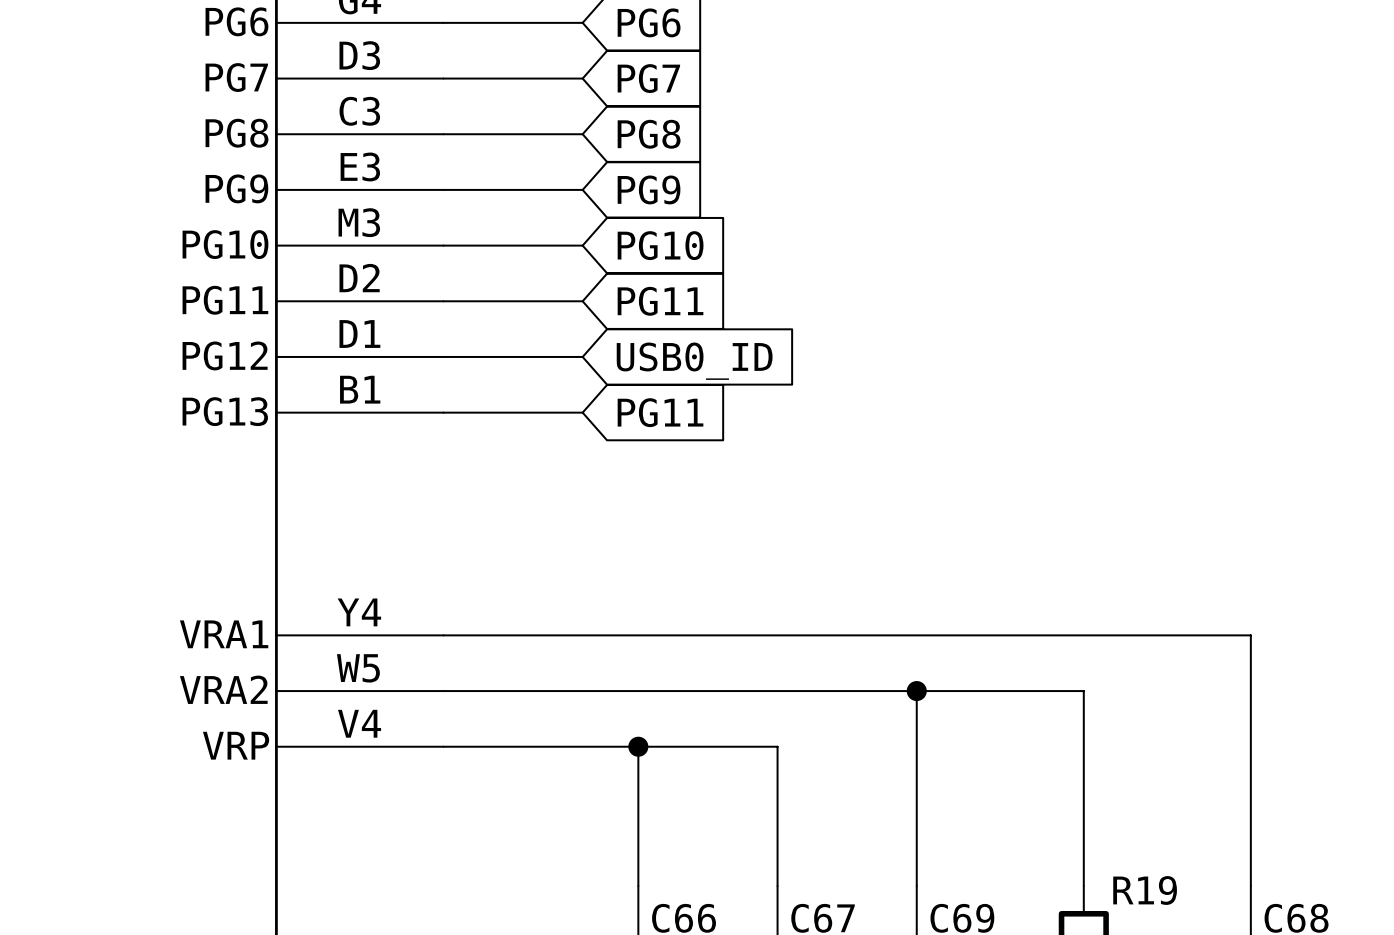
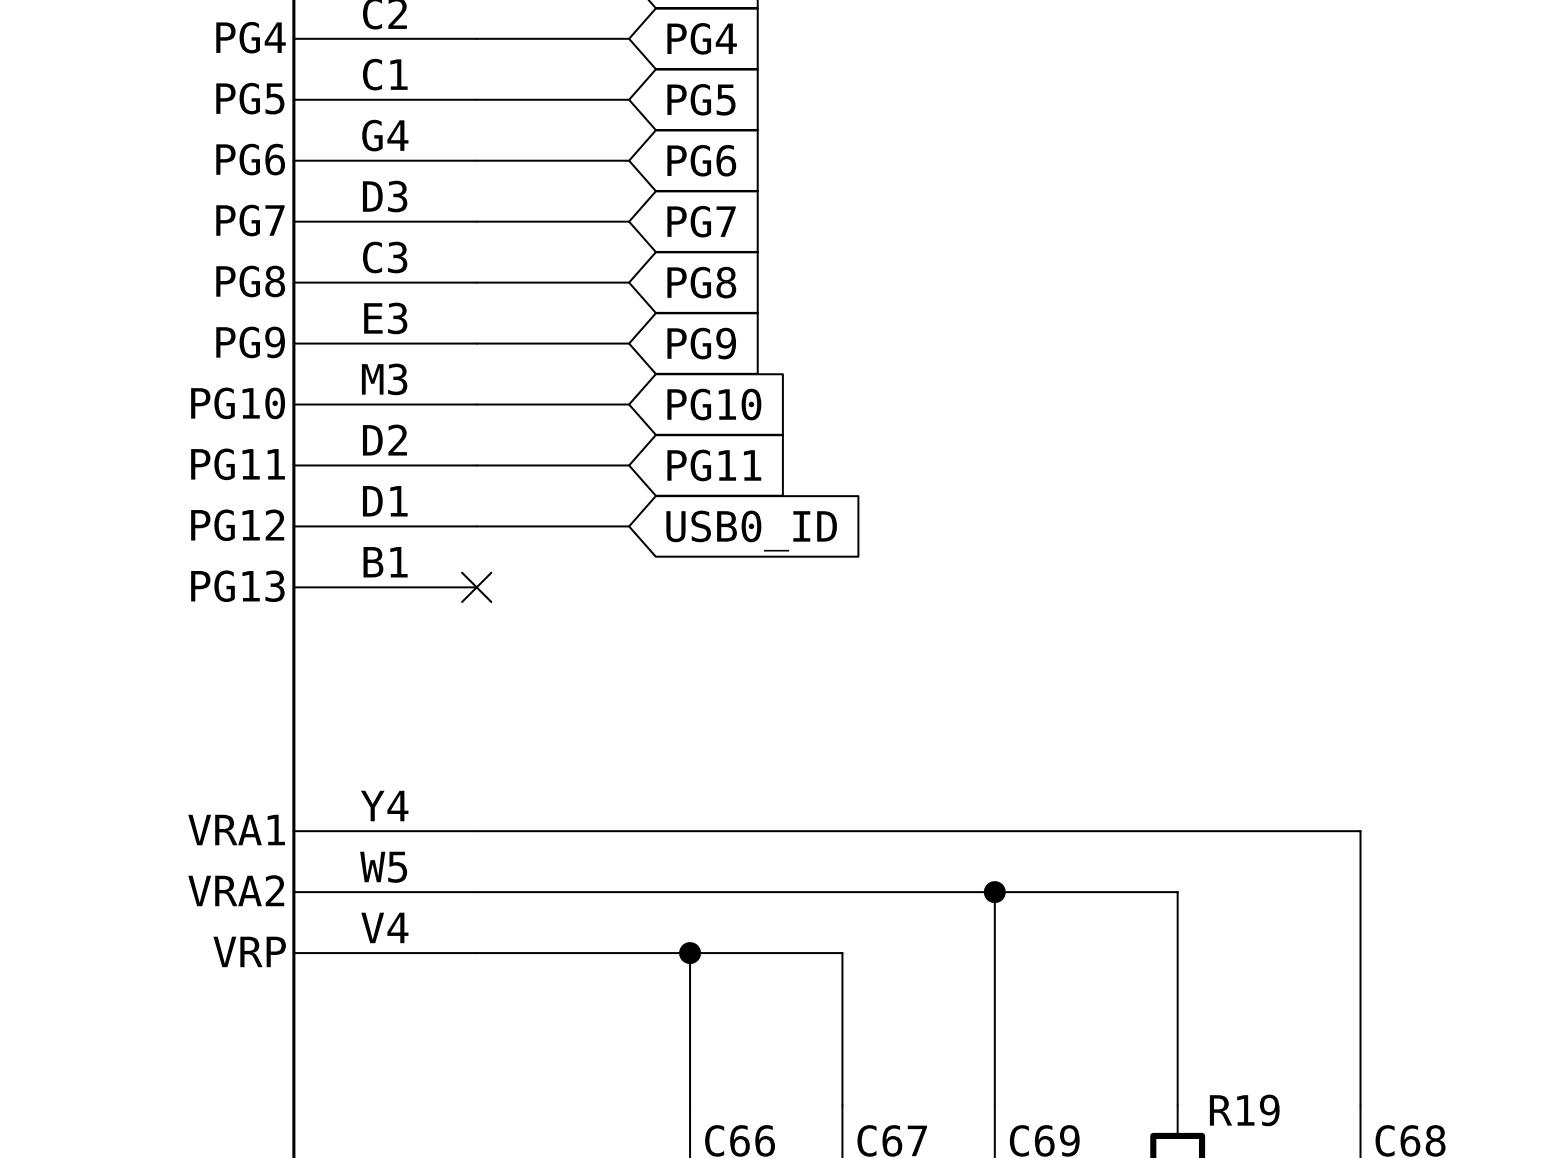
wire: (443, 412) (582, 412) -> none
no-connect mark: none -> (476, 587)
global label: PG11 (660, 412) -> none

